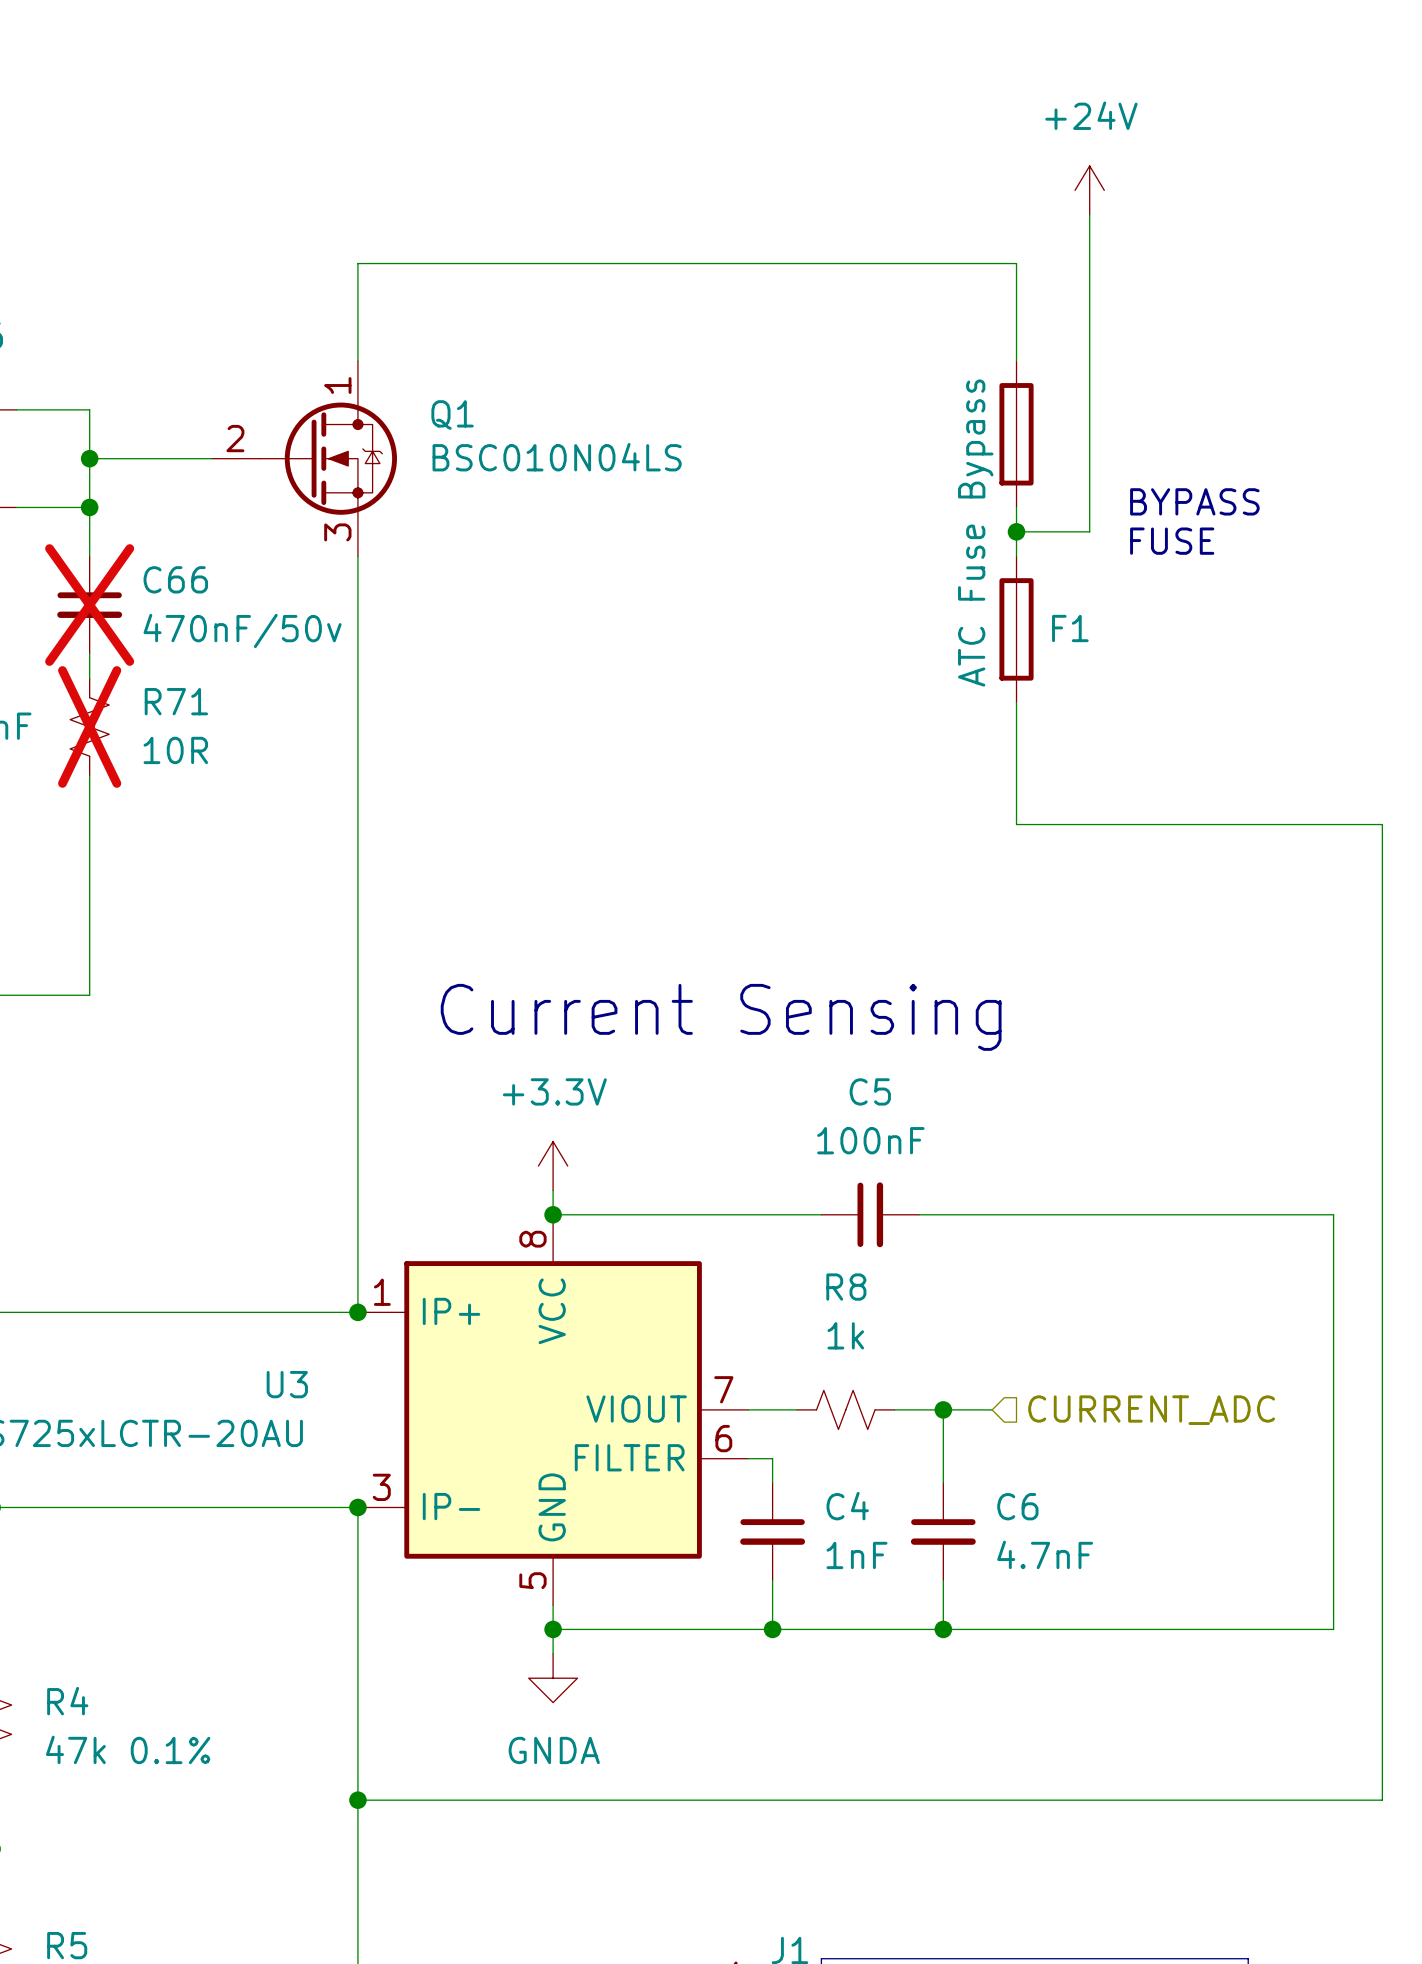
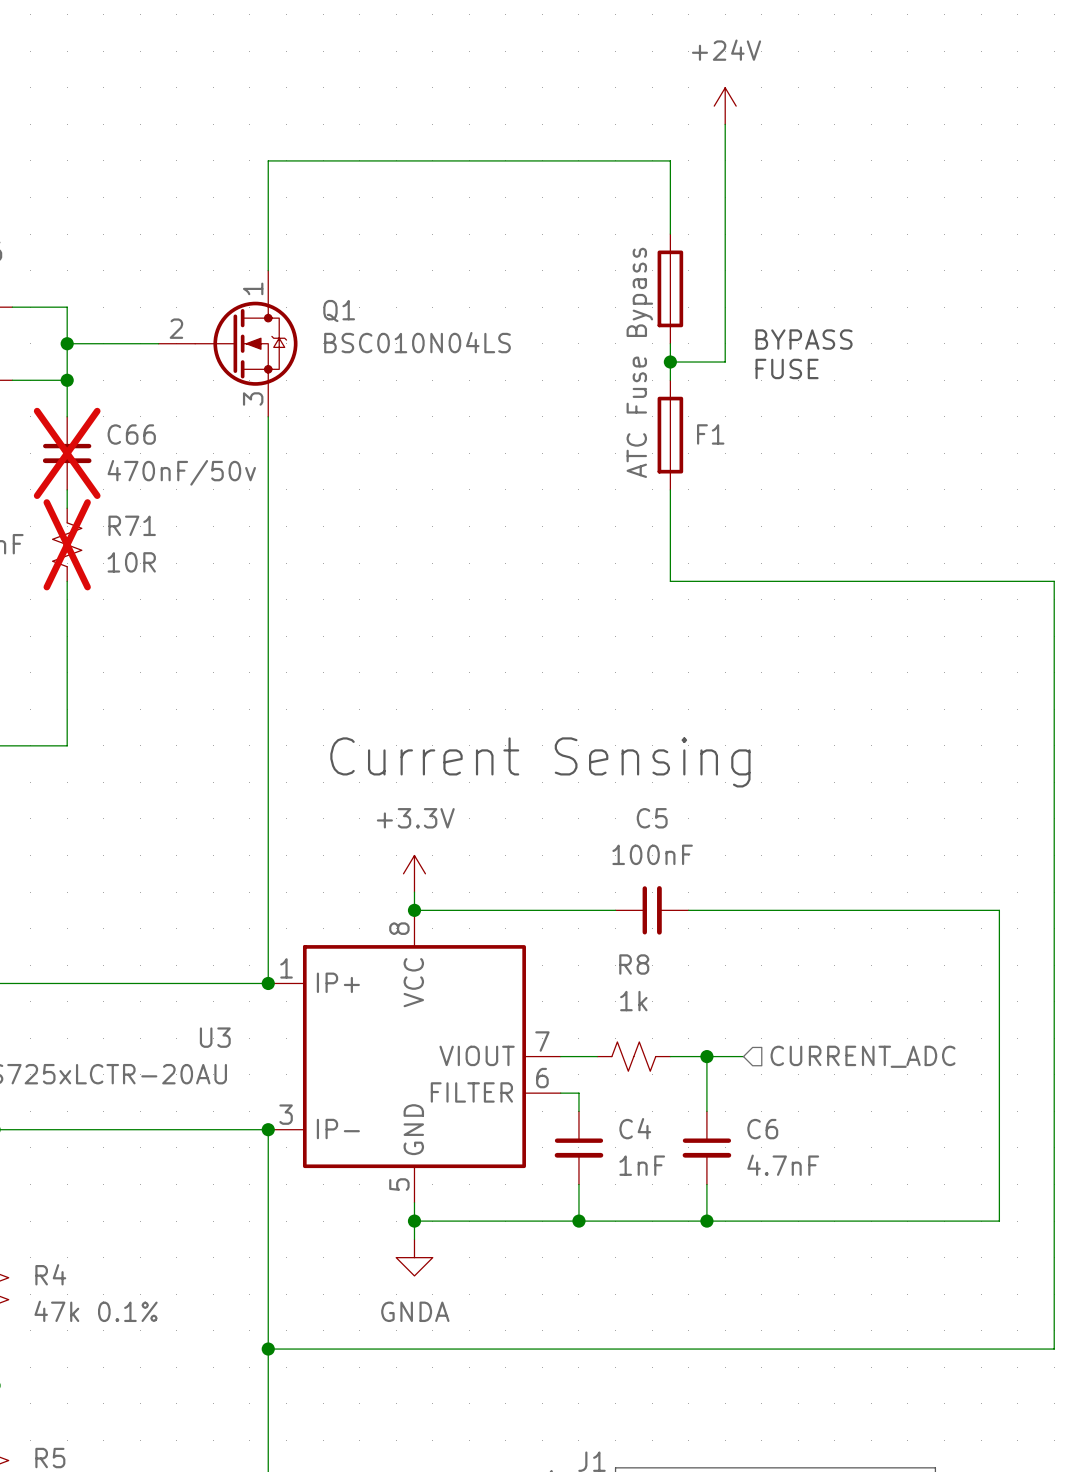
power symbol position: +24V (1089, 190) -> +24V (725, 106)
wire: (1089, 214) (1089, 531) (1016, 531) -> (725, 124) (725, 362) (670, 362)
wire: (357, 263) (1016, 263) (1016, 361) -> (268, 197) (268, 160) (670, 160) (670, 234)
junction: none -> (670, 362)
text position: BYPASS (1194, 501) -> BYPASS (804, 339)
wire: (1016, 507) (1016, 556) -> (670, 343) (670, 380)
junction: (1016, 531) -> none
F1 position: (1016, 531) -> (670, 362)
text position: FUSE (1172, 541) -> FUSE (787, 368)
wire: (1016, 702) (1016, 824) (1382, 824) (1382, 1800) -> (670, 489) (670, 581) (1054, 581) (1054, 1349) (1035, 1349)

